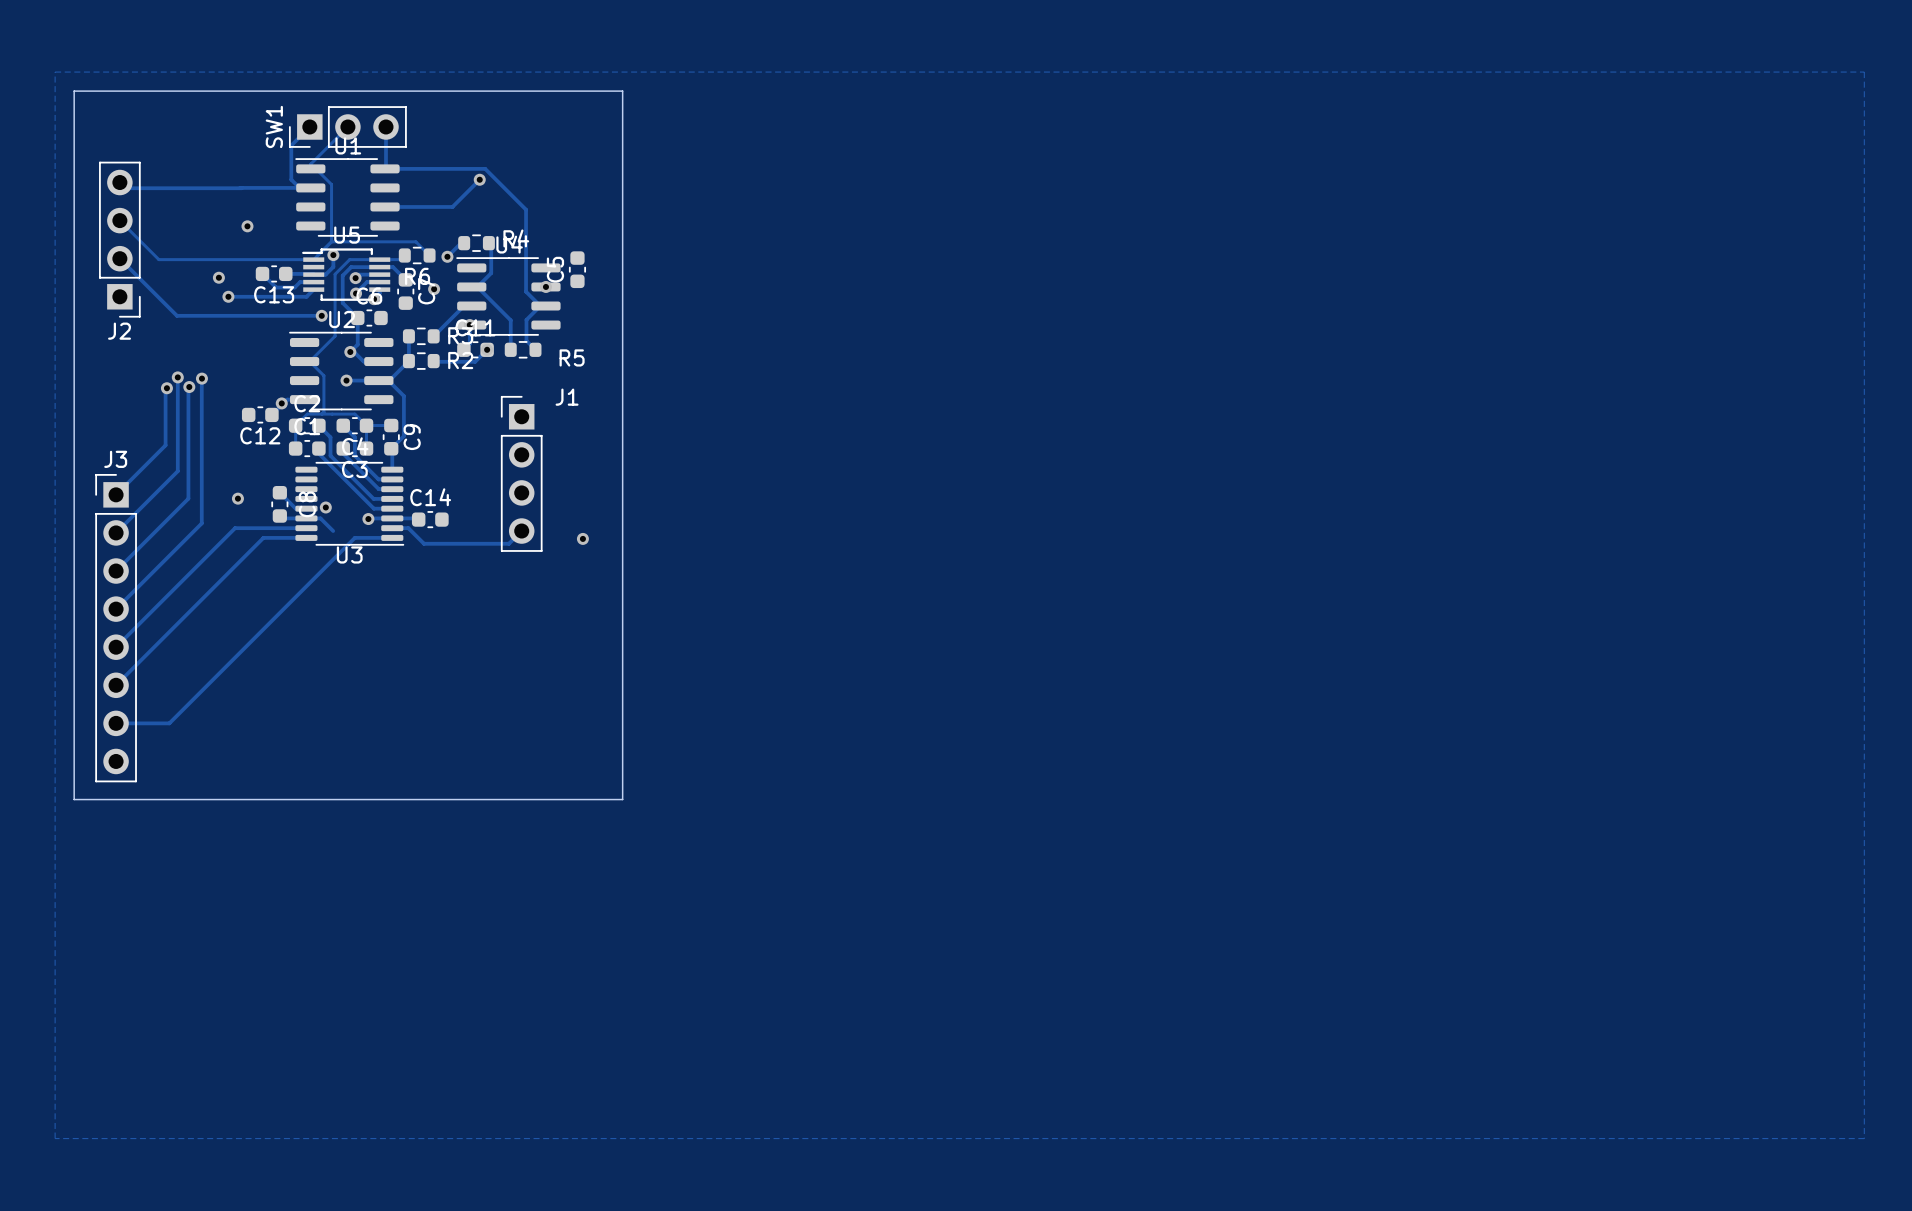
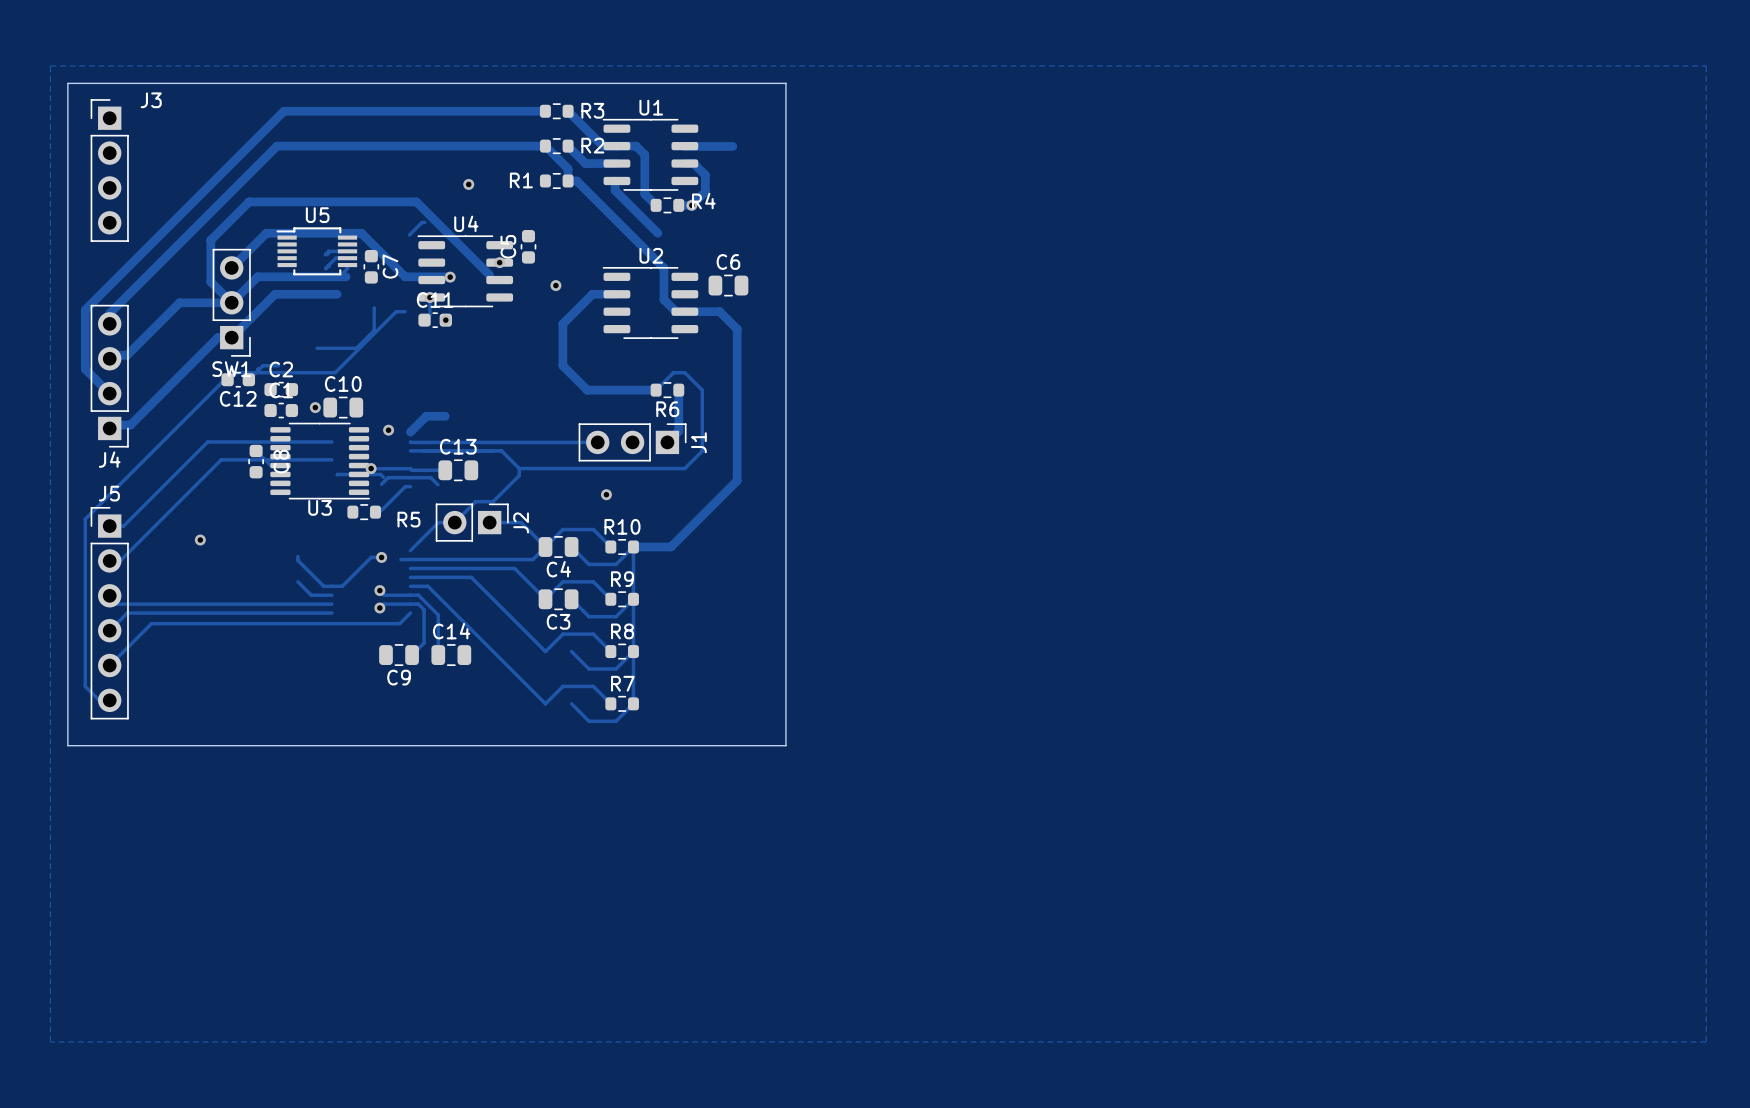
board edge: (622, 91) (622, 799) (74, 799) -> (569, 83) (785, 83) (785, 745) (67, 745) (67, 731)
track: none -> (545, 111) (284, 111) (85, 309) (85, 369) (109, 393)
track: none -> (568, 111) (602, 146) (636, 146) (644, 154) (644, 194) (656, 205)
track: (309, 126) (291, 145) (291, 179) (299, 187) -> none
track: (347, 126) (310, 164) (310, 168) (315, 168) (331, 184) (331, 241) -> none
SW1 rotation: 0° (347, 126) -> 90° counterclockwise (231, 302)
SW1 position: (347, 126) -> (231, 302)
track: (386, 126) (385, 168) (485, 168) (526, 209) (526, 291) -> (231, 302) (210, 281) (210, 240) (249, 201) (416, 201) (481, 266)
track: none -> (568, 146) (585, 163) (616, 163)
track: none -> (684, 146) (732, 146)
J2 footprint: [99, 161, 141, 318] -> [435, 503, 509, 542]
track: none -> (684, 163) (693, 163) (705, 175) (705, 191) (691, 205) (678, 205)
track: (479, 179) (452, 206) (385, 206) -> none
via position: (479, 179) -> (468, 184)
track: (119, 182) (125, 188) (241, 187) -> none
track: (240, 187) (310, 187) -> none
U1 position: (347, 197) -> (650, 154)
R1: none -> (556, 180)
track: none -> (615, 180) (615, 190) (657, 233)
track: (119, 220) (158, 259) (313, 259) (331, 241) -> none
via: none -> (691, 205)
via: (247, 226) -> none
track: (331, 241) (415, 241) (429, 255) -> none
R4 position: (476, 243) -> (667, 205)
track: (488, 243) (491, 245) (491, 273) (477, 286) -> none
track: (333, 255) (333, 266) (325, 274) (285, 273) -> none
via: (333, 255) -> none
track: (404, 255) (400, 259) (349, 259) (335, 274) (335, 336) (309, 361) -> none
R6 position: (417, 255) -> (667, 390)
via: (447, 256) -> none
track: (119, 258) (177, 315) (321, 315) -> none
C13 footprint: [255, 265, 293, 283] -> [438, 459, 479, 482]
track: (262, 273) (276, 287) (294, 287) (300, 282) (313, 282) -> none
via: (218, 277) -> none
via: (355, 278) -> none
track: (405, 279) (392, 267) (351, 267) (342, 275) (342, 302) (357, 318) (357, 344) (350, 352) (354, 352) (363, 361) (378, 361) -> none
track: (477, 286) (510, 320) (510, 349) -> none
track: (313, 289) (306, 296) (228, 296) -> none
via: (434, 289) -> none
track width: thin (526, 291) (540, 306) -> thick (481, 266) (494, 280)
track: none -> (231, 267) (266, 233) (361, 233) (405, 276) (449, 276)
via: (356, 293) -> none
C13 name position: C13 (274, 294) -> C13 (458, 446)
via: (228, 296) -> none
via: (374, 299) -> none
track: none -> (346, 276) (257, 276) (231, 302)
via: none -> (450, 277)
track: (471, 306) (464, 306) (433, 336) -> none
track: (540, 306) (526, 319) (526, 340) (535, 349) -> none
C6 footprint: [350, 309, 388, 327] -> [708, 274, 749, 297]
via: none -> (555, 285)
via: (321, 315) -> none
track: none -> (337, 294) (275, 294) (231, 337) (217, 337) (130, 424) (113, 424) (109, 428)
track: none -> (616, 294) (592, 294) (562, 323) (562, 365) (587, 390) (656, 390) (673, 372) (684, 372) (702, 390) (702, 451) (684, 468) (519, 468)
track: none -> (231, 302) (179, 302) (127, 355) (113, 355) (109, 358)
J2 name position: J2 (119, 331) -> J2 (521, 522)
R3 position: (421, 336) -> (556, 111)
track: none -> (405, 311) (396, 311) (335, 372) (231, 372) (85, 519) (85, 686) (99, 700) (109, 700)
track: (487, 349) (475, 361) (433, 361) -> none
R5 position: (523, 349) -> (364, 512)
via: (350, 352) -> none
track: none -> (109, 323) (109, 313) (277, 146) (545, 146) (568, 168) (568, 180) (576, 180) (663, 268) (663, 299) (675, 311) (719, 311) (737, 329) (737, 480) (670, 546) (633, 546)
track: (309, 361) (323, 375) (323, 412) (322, 414) -> none
R2 position: (421, 361) -> (556, 146)
U2 position: (341, 371) -> (650, 302)
track: (177, 377) (177, 471) (116, 532) -> none
via: (177, 377) -> none
track: (201, 378) (201, 523) (116, 609) -> none
via: (201, 378) -> none
via: (346, 380) -> none
track: (388, 380) (403, 396) (403, 436) (391, 448) (392, 469) -> none
track: (189, 387) (188, 498) (116, 571) -> none
via: (189, 387) -> none
track: (166, 388) (165, 445) (116, 494) -> none
via: (166, 388) -> none
J1 footprint: [500, 395, 543, 552] -> [578, 423, 687, 462]
J1 name position: J1 (567, 397) -> J1 (698, 442)
via: (281, 403) -> none
J4: none -> (109, 376)
C4 footprint: [336, 417, 374, 435] -> [538, 536, 579, 558]
C9 footprint: [382, 418, 400, 456] -> [379, 644, 419, 666]
track: (318, 425) (330, 437) (330, 455) (373, 498) (392, 498) -> none
track: (343, 425) (354, 437) (354, 455) (378, 479) (392, 479) -> none
track: (366, 425) (391, 425) -> none
track: none -> (678, 390) (678, 431) (667, 442)
C9 name position: C9 (412, 437) -> C9 (399, 677)
C3 footprint: [336, 440, 374, 458] -> [538, 588, 579, 611]
via: none -> (315, 407)
C10: none -> (343, 407)
track: (295, 448) (295, 425) (307, 414) (354, 414) (366, 425) (366, 448) -> none
track: (318, 448) (318, 453) (373, 508) (392, 508) -> none
track: (343, 448) (343, 453) (378, 489) (392, 489) -> none
track: none -> (445, 416) (426, 416) (410, 432)
J3 name position: J3 (115, 459) -> J3 (151, 100)
via: none -> (388, 430)
J3 footprint: [95, 474, 137, 783] -> [90, 99, 129, 242]
track: none -> (331, 442) (207, 442) (123, 526) (109, 526)
track: none -> (410, 442) (597, 442)
track: none -> (410, 450) (501, 450) (519, 468)
via: (237, 498) -> none
track: none -> (331, 459) (221, 459) (120, 560) (109, 560)
via: (325, 507) -> none
track: none -> (371, 468) (445, 470)
via: none -> (371, 468)
C14 footprint: [411, 511, 449, 529] -> [431, 644, 472, 666]
track: none -> (519, 468) (519, 475) (493, 501) (475, 501) (454, 522) (438, 522) (410, 550)
track: (279, 515) (282, 518) (320, 518) (333, 531) -> none
via: (368, 519) -> none
track: (306, 528) (235, 528) (116, 647) -> none
track: (392, 528) (408, 528) (424, 543) (508, 543) (521, 531) -> none
track: none -> (381, 484) (388, 477) (430, 477) (437, 484)
track: none -> (410, 486) (405, 486) (379, 512)
track: (306, 537) (263, 537) (116, 685) -> none
track: (392, 537) (354, 537) (169, 723) (116, 723) -> none
via position: (582, 538) -> (606, 494)
track: none -> (489, 522) (521, 522) (545, 546)
track: none -> (562, 529) (593, 529) (610, 546)
track: none -> (562, 529) (532, 559) (400, 559)
via: none -> (200, 540)
track: none -> (571, 546) (589, 564) (616, 564) (633, 546)
R10: none -> (622, 546)
track: none -> (633, 546) (633, 703) (616, 721) (589, 721) (571, 703)
track: none -> (297, 556) (297, 560) (323, 586) (342, 586) (371, 557) (381, 557)
via: none -> (381, 557)
track: none -> (410, 568) (514, 568) (545, 599) (562, 581) (593, 581) (610, 599) (610, 597)
track: none -> (410, 577) (471, 577) (545, 651) (562, 634) (593, 634) (610, 651)
track: none -> (297, 581) (311, 595) (331, 595)
track: none -> (410, 586) (427, 586) (545, 703) (562, 686) (593, 686) (610, 703)
track: none -> (379, 590) (384, 595) (418, 595) (438, 615) (438, 655)
via: none -> (379, 590)
track: none -> (109, 595) (118, 604) (331, 604)
track: none -> (571, 599) (589, 616) (616, 616) (633, 599)
R9: none -> (622, 599)
track: none -> (379, 607) (383, 604) (418, 604) (424, 609) (424, 643) (412, 655)
via: none -> (379, 607)
track: none -> (331, 613) (127, 613) (109, 630)
track: none -> (410, 613) (399, 623) (151, 623) (109, 665)
J5: none -> (109, 613)
track: none -> (571, 651) (589, 668) (616, 668) (633, 651)
R8: none -> (622, 651)
R7: none -> (622, 703)

